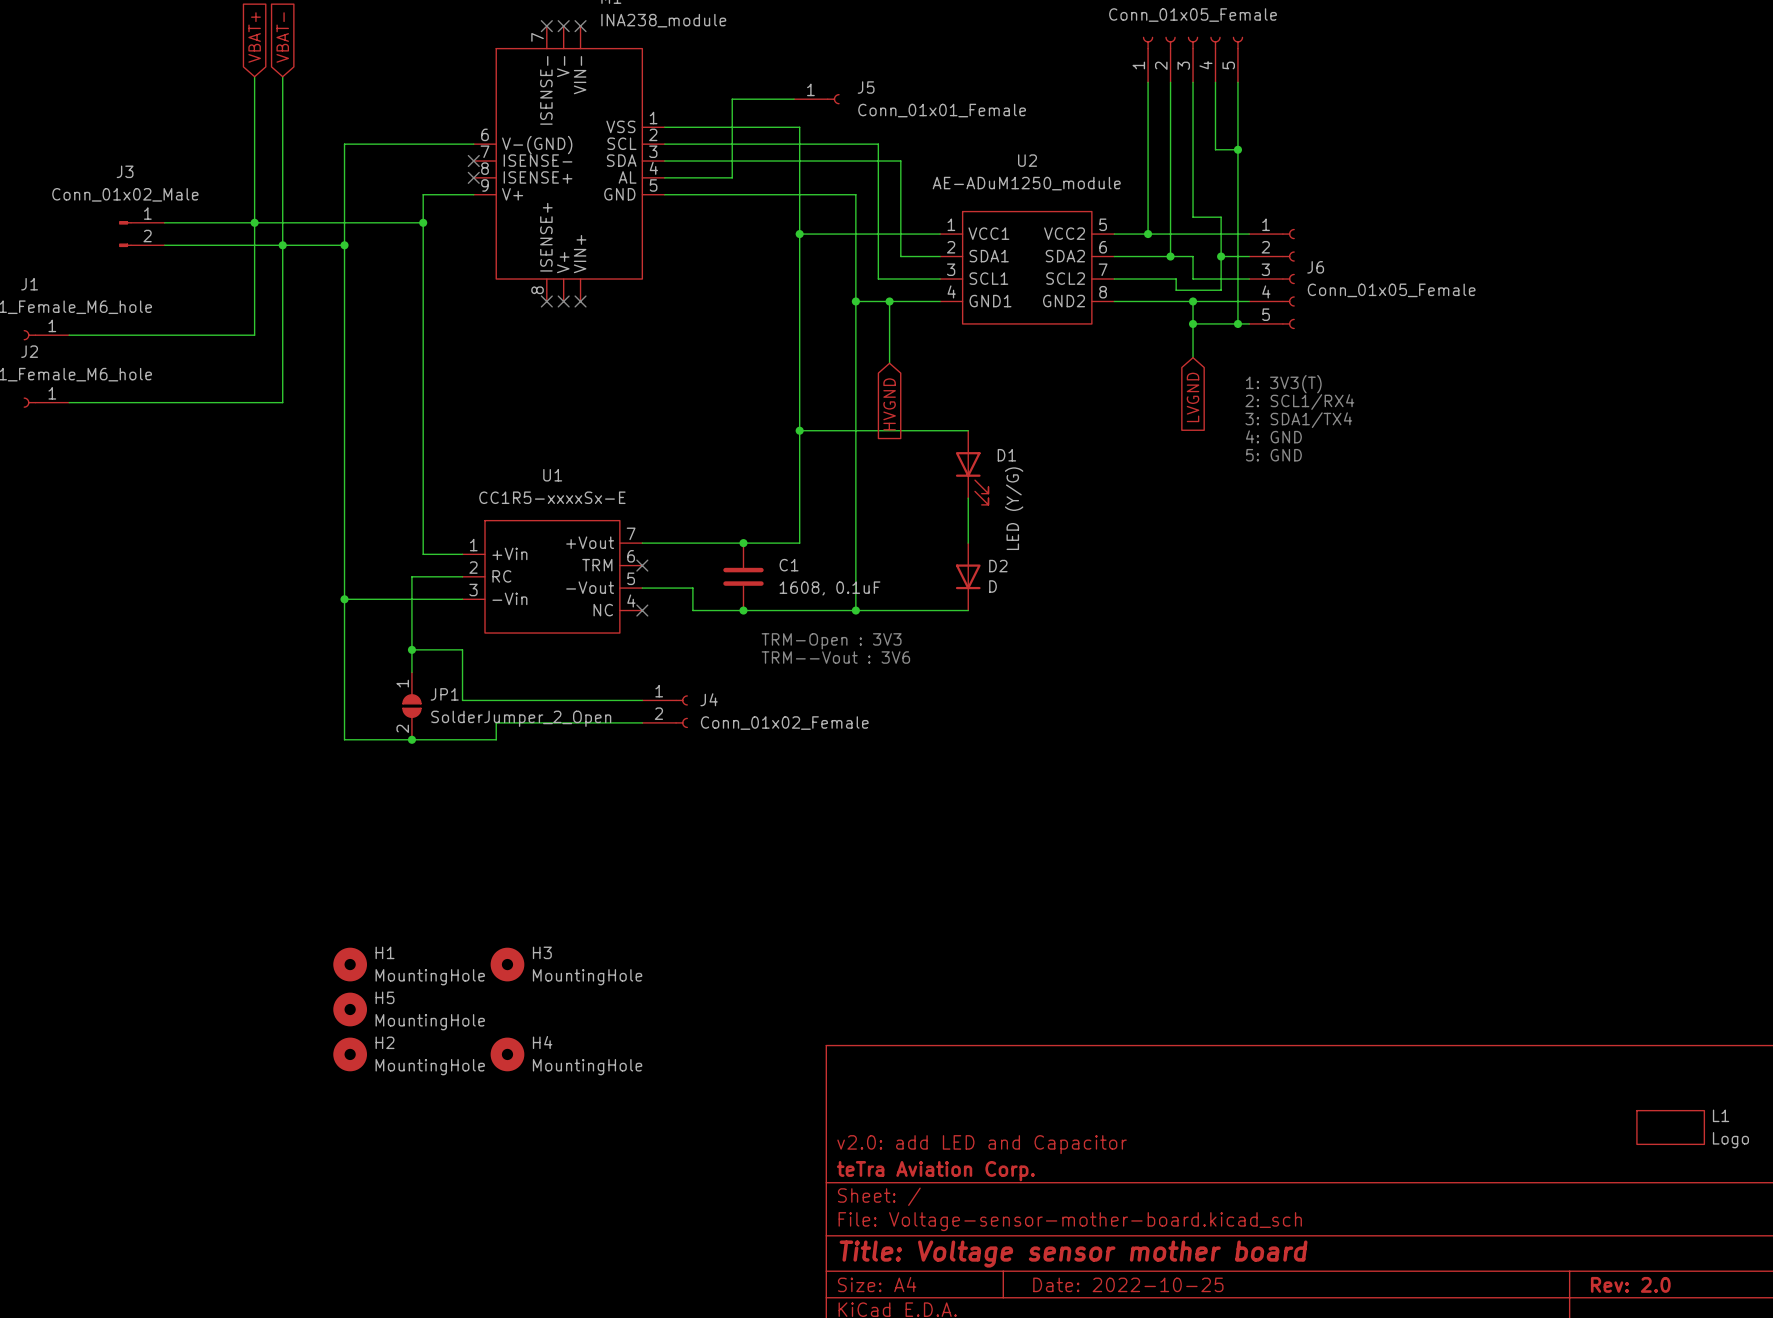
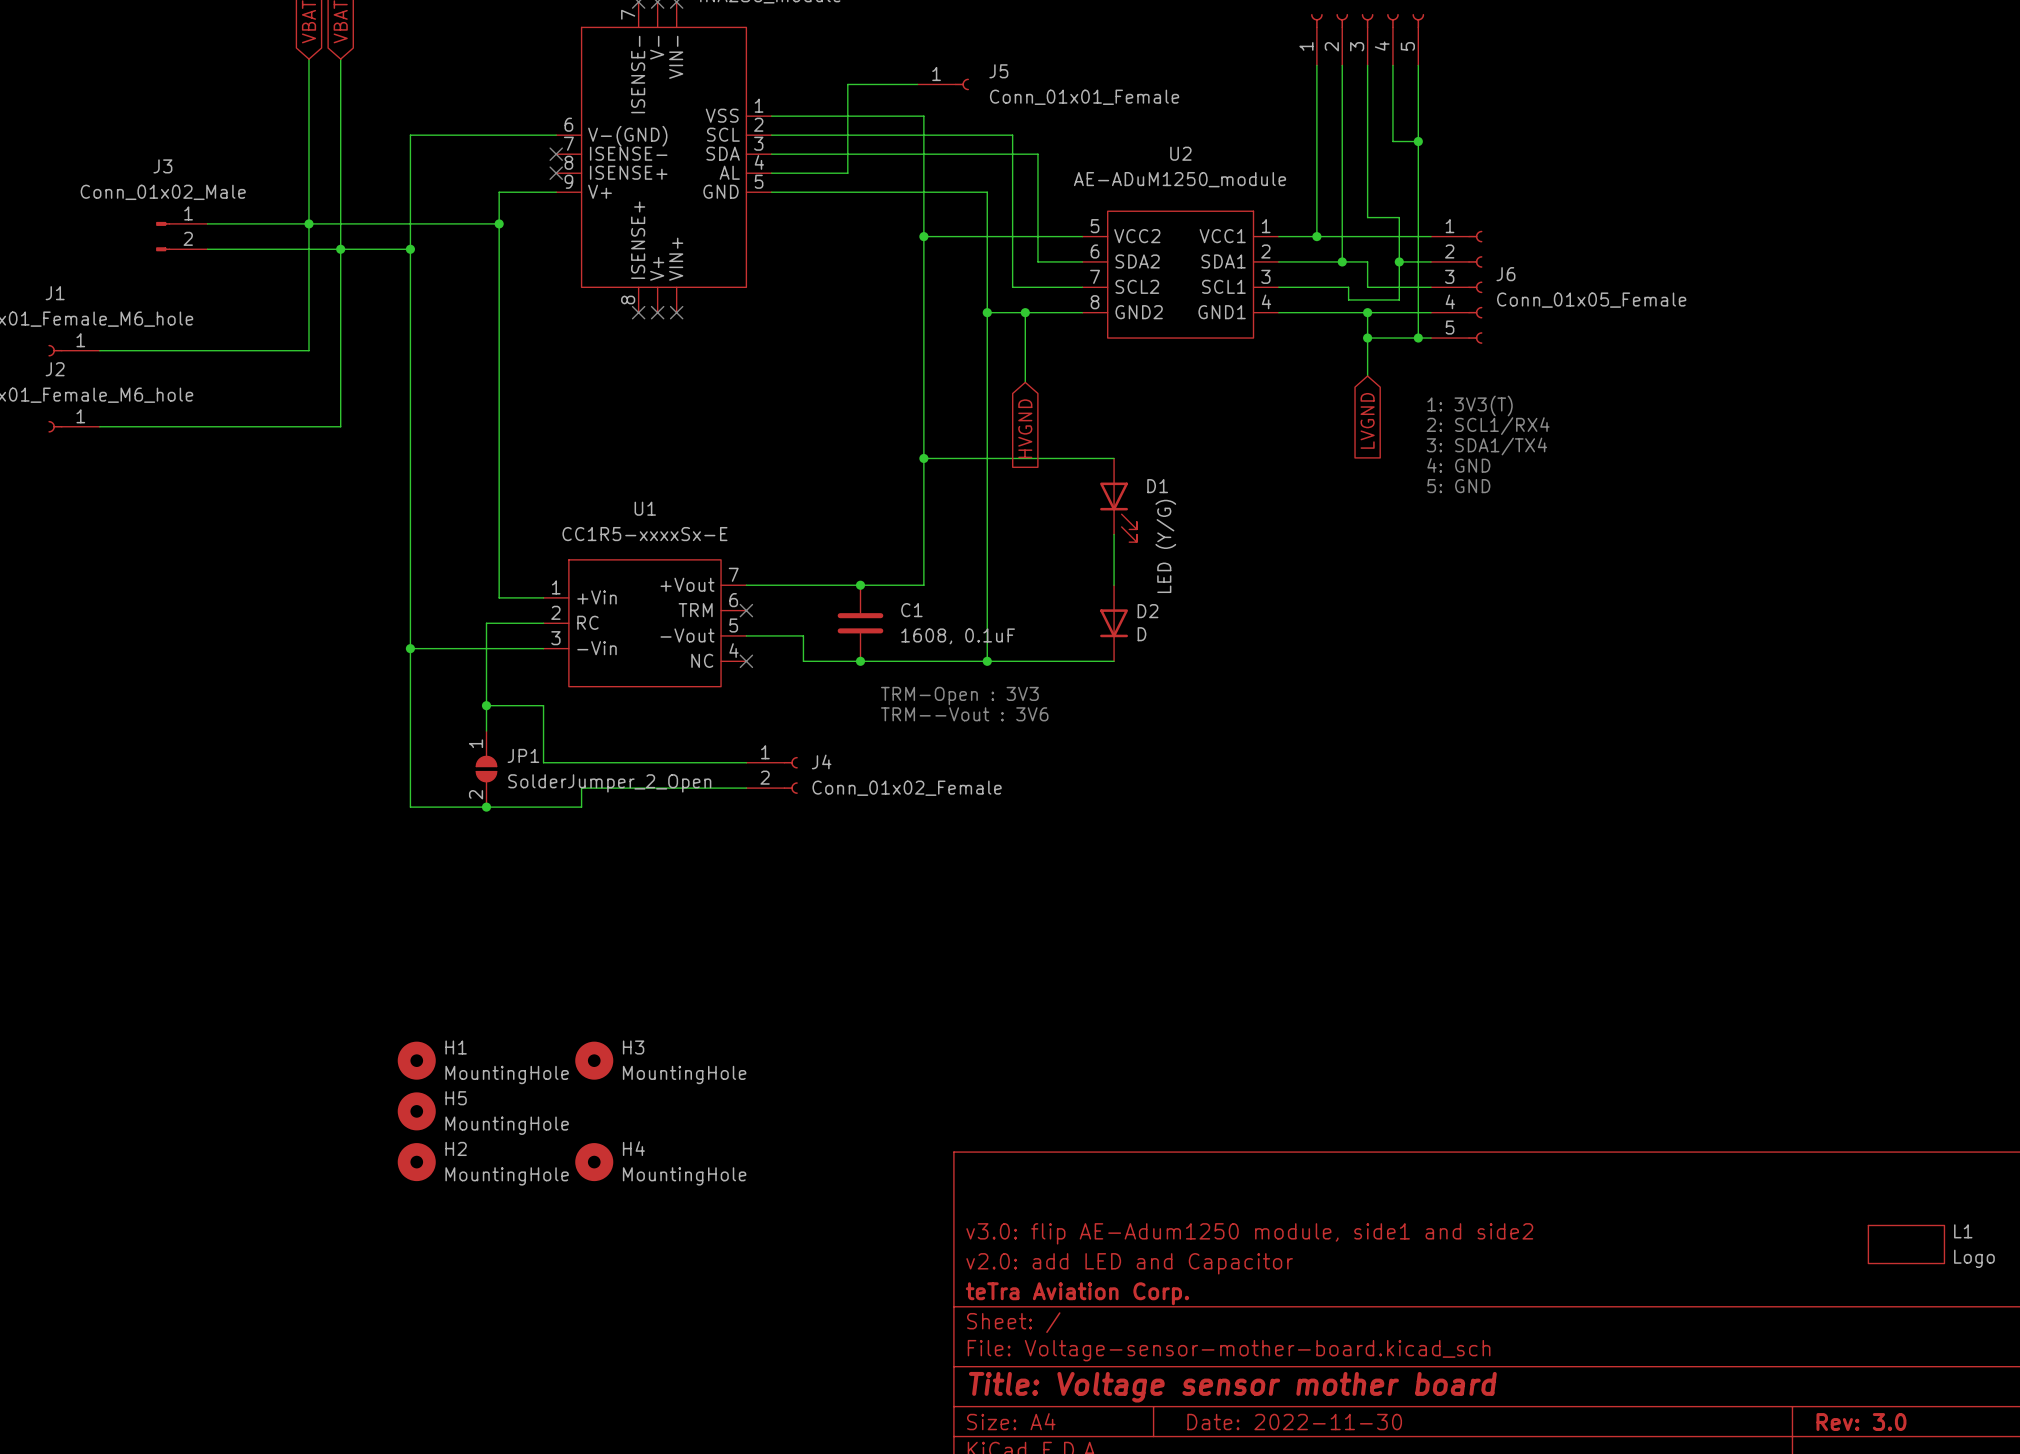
U2 flip: as is (1027, 267) -> left-right (1180, 274)
title block: none -> v3.0: flip AE-Adum1250 module, side1 and side2 (1249, 1233)
title block: Date: 2022-10-25 (1128, 1284) -> Date: 2022-11-30 (1294, 1422)
title block: Rev: 2.0 (1630, 1284) -> Rev: 3.0 (1861, 1422)

